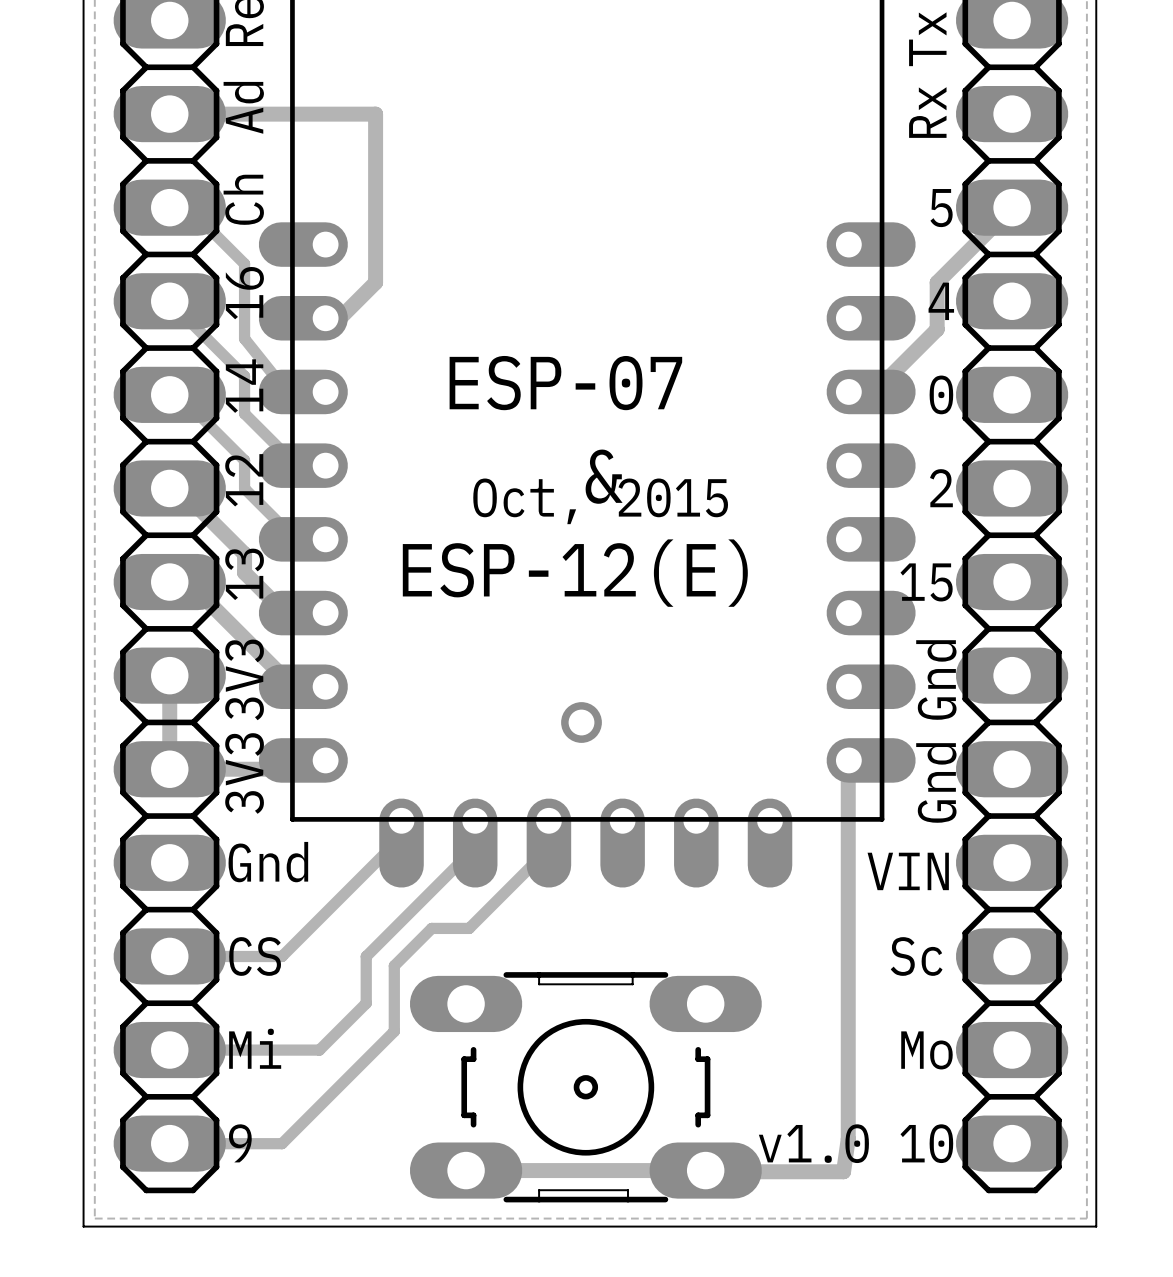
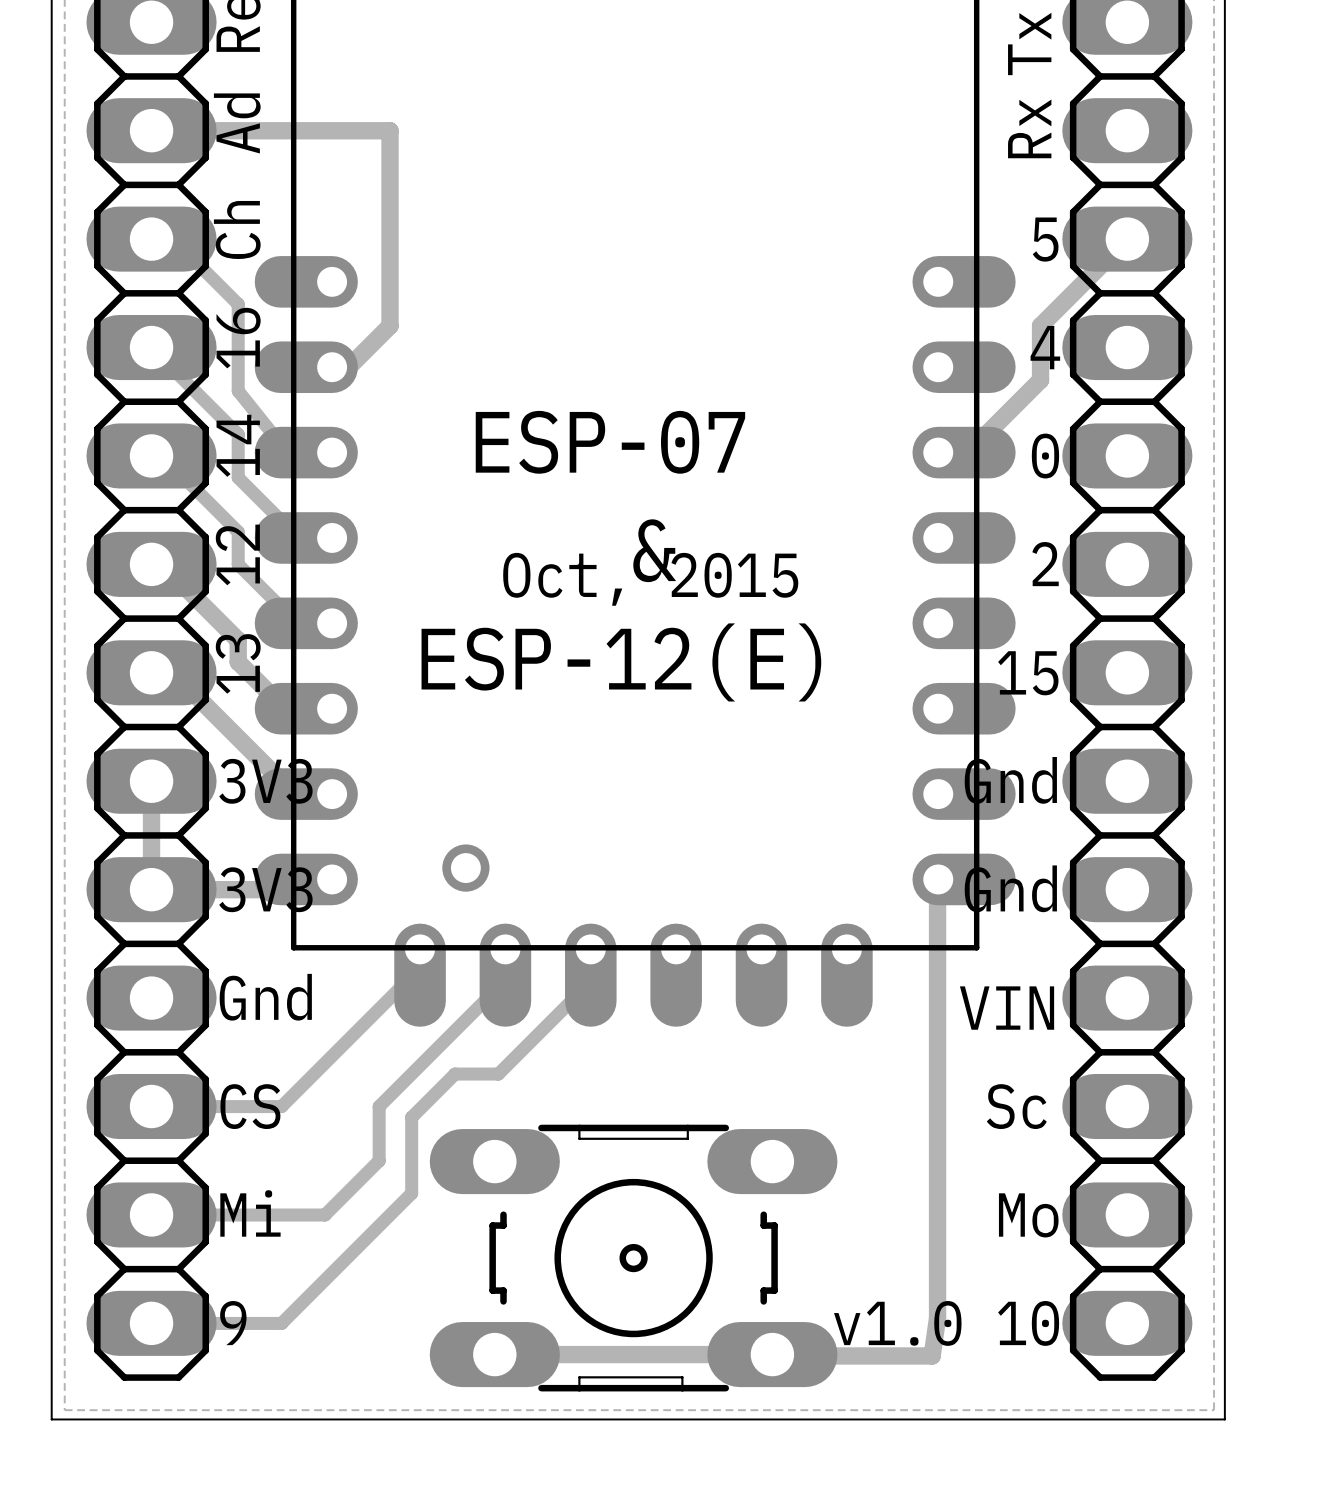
text rotation: 0° (244, 679) -> 90° clockwise (265, 781)
text rotation: 0° (936, 680) -> 90° clockwise (1010, 888)
via position: (581, 722) -> (465, 868)
text rotation: 0° (244, 773) -> 90° clockwise (265, 889)
text rotation: 0° (936, 782) -> 90° clockwise (1010, 780)

